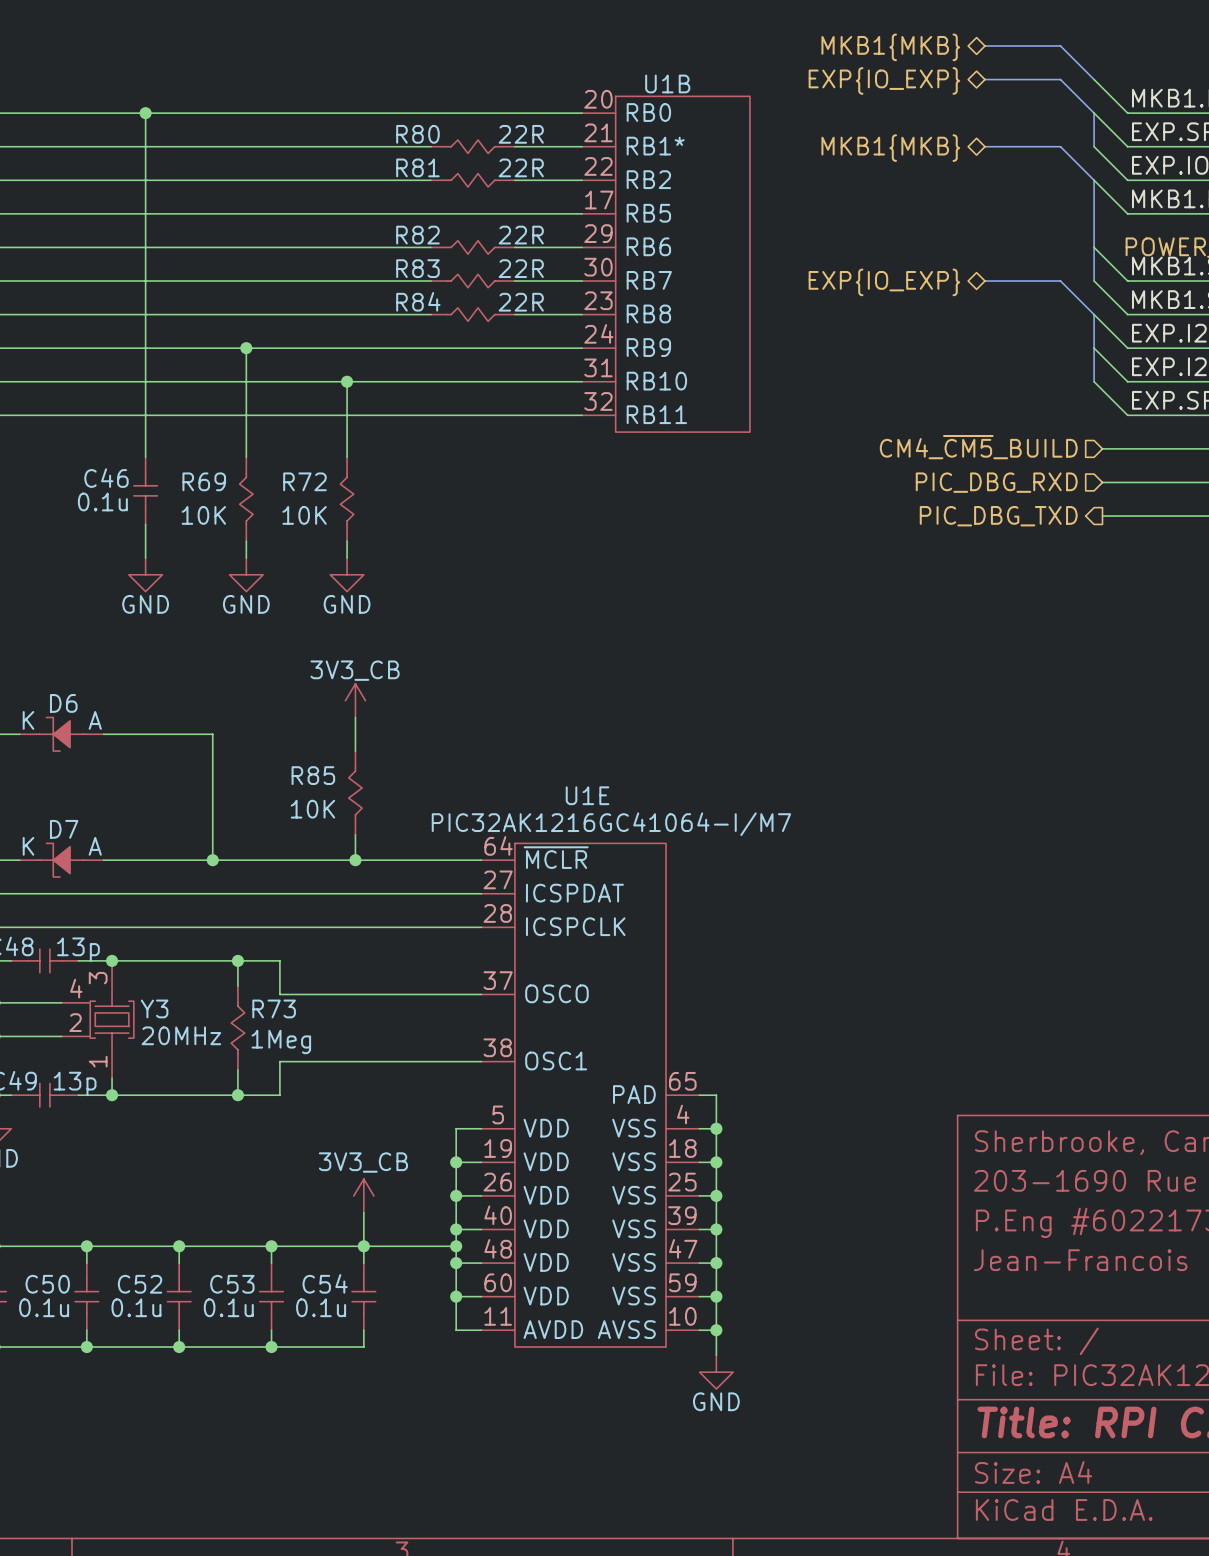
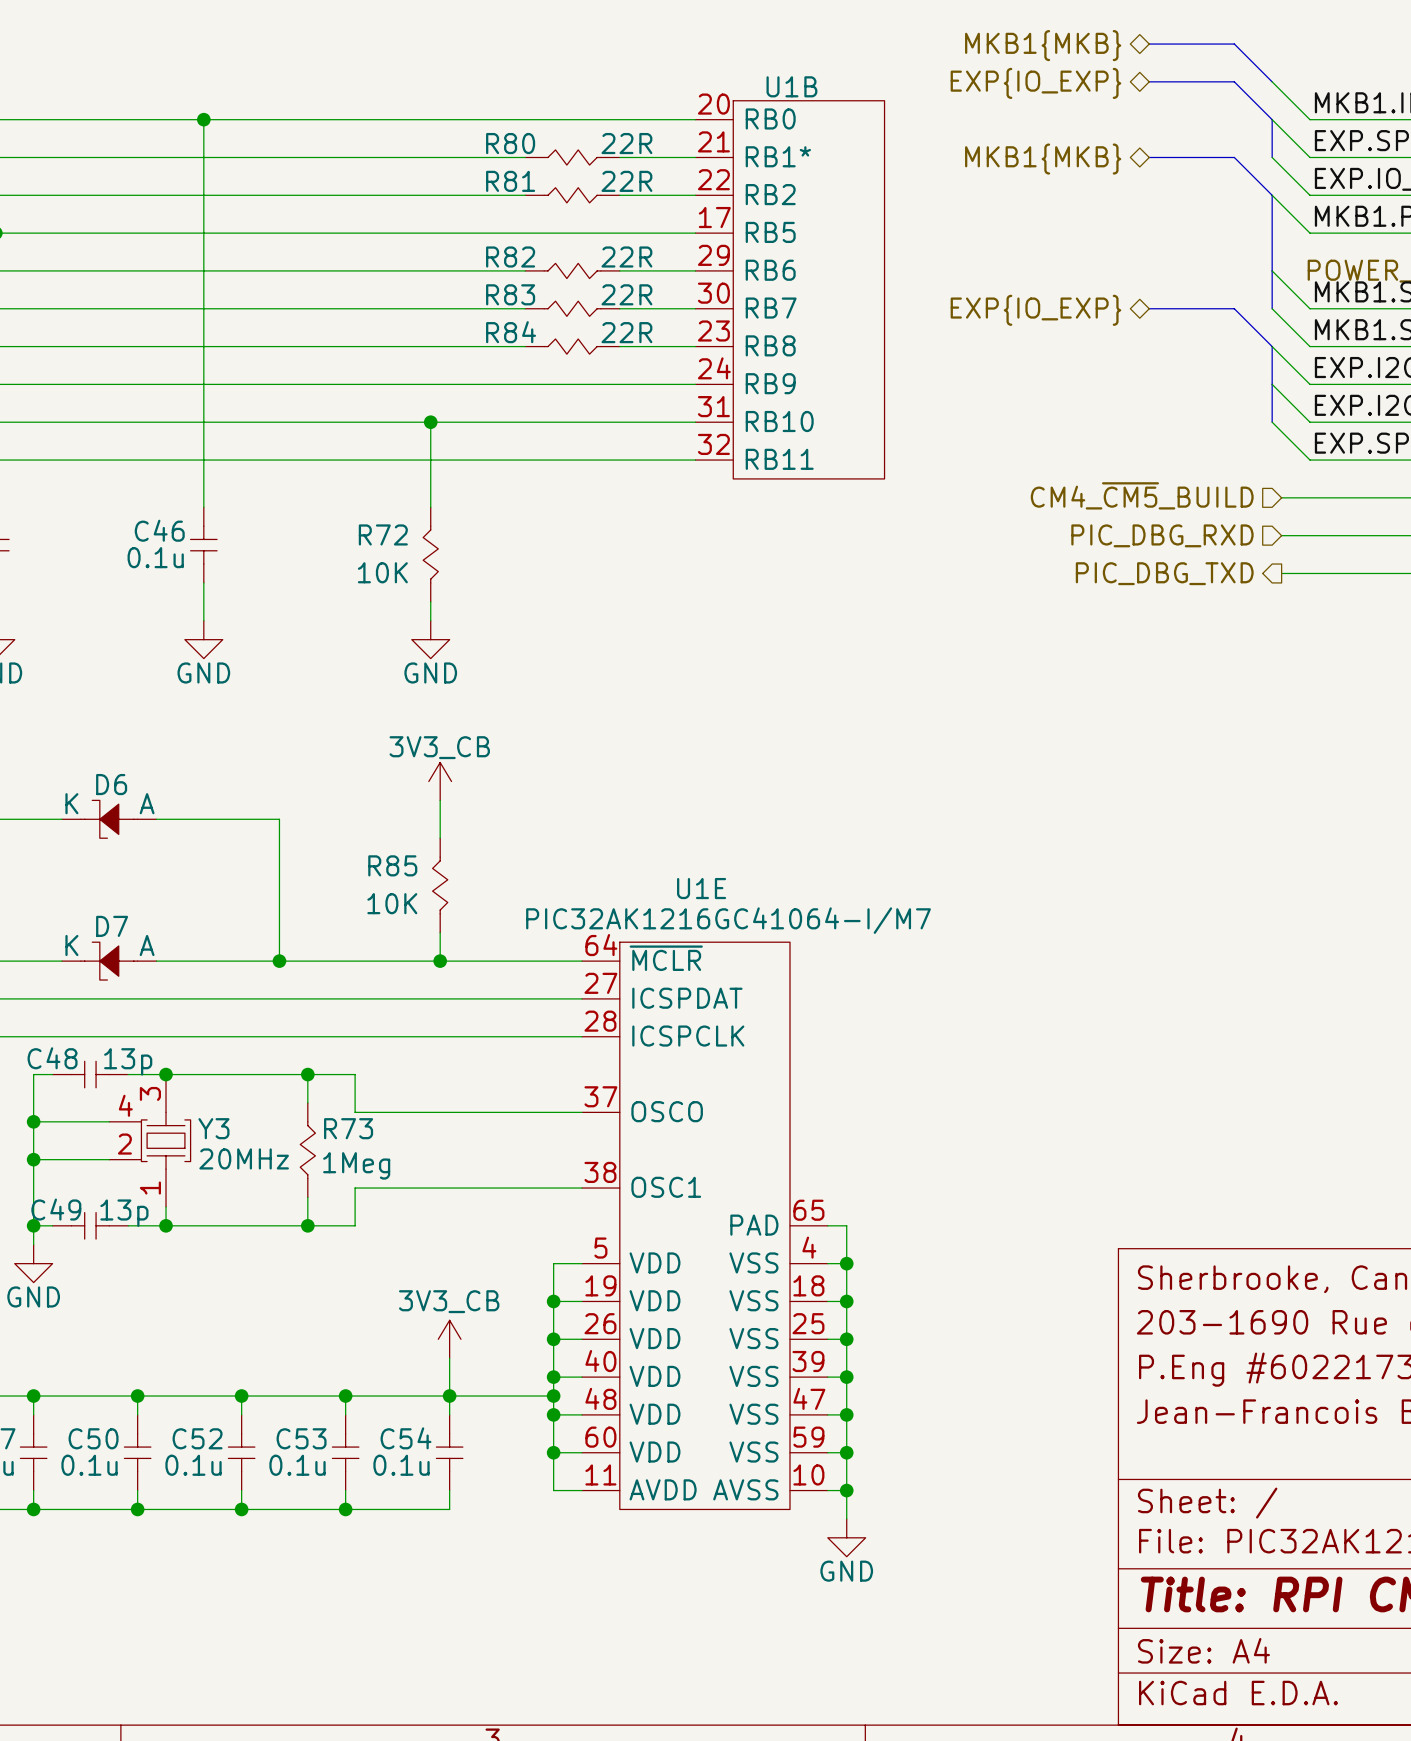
wire: (246, 348) (246, 457) -> none
junction: (246, 348) -> none
R69: 10K (246, 499) -> none
wire: (246, 541) (246, 558) -> none
power symbol: GND (246, 574) -> none

